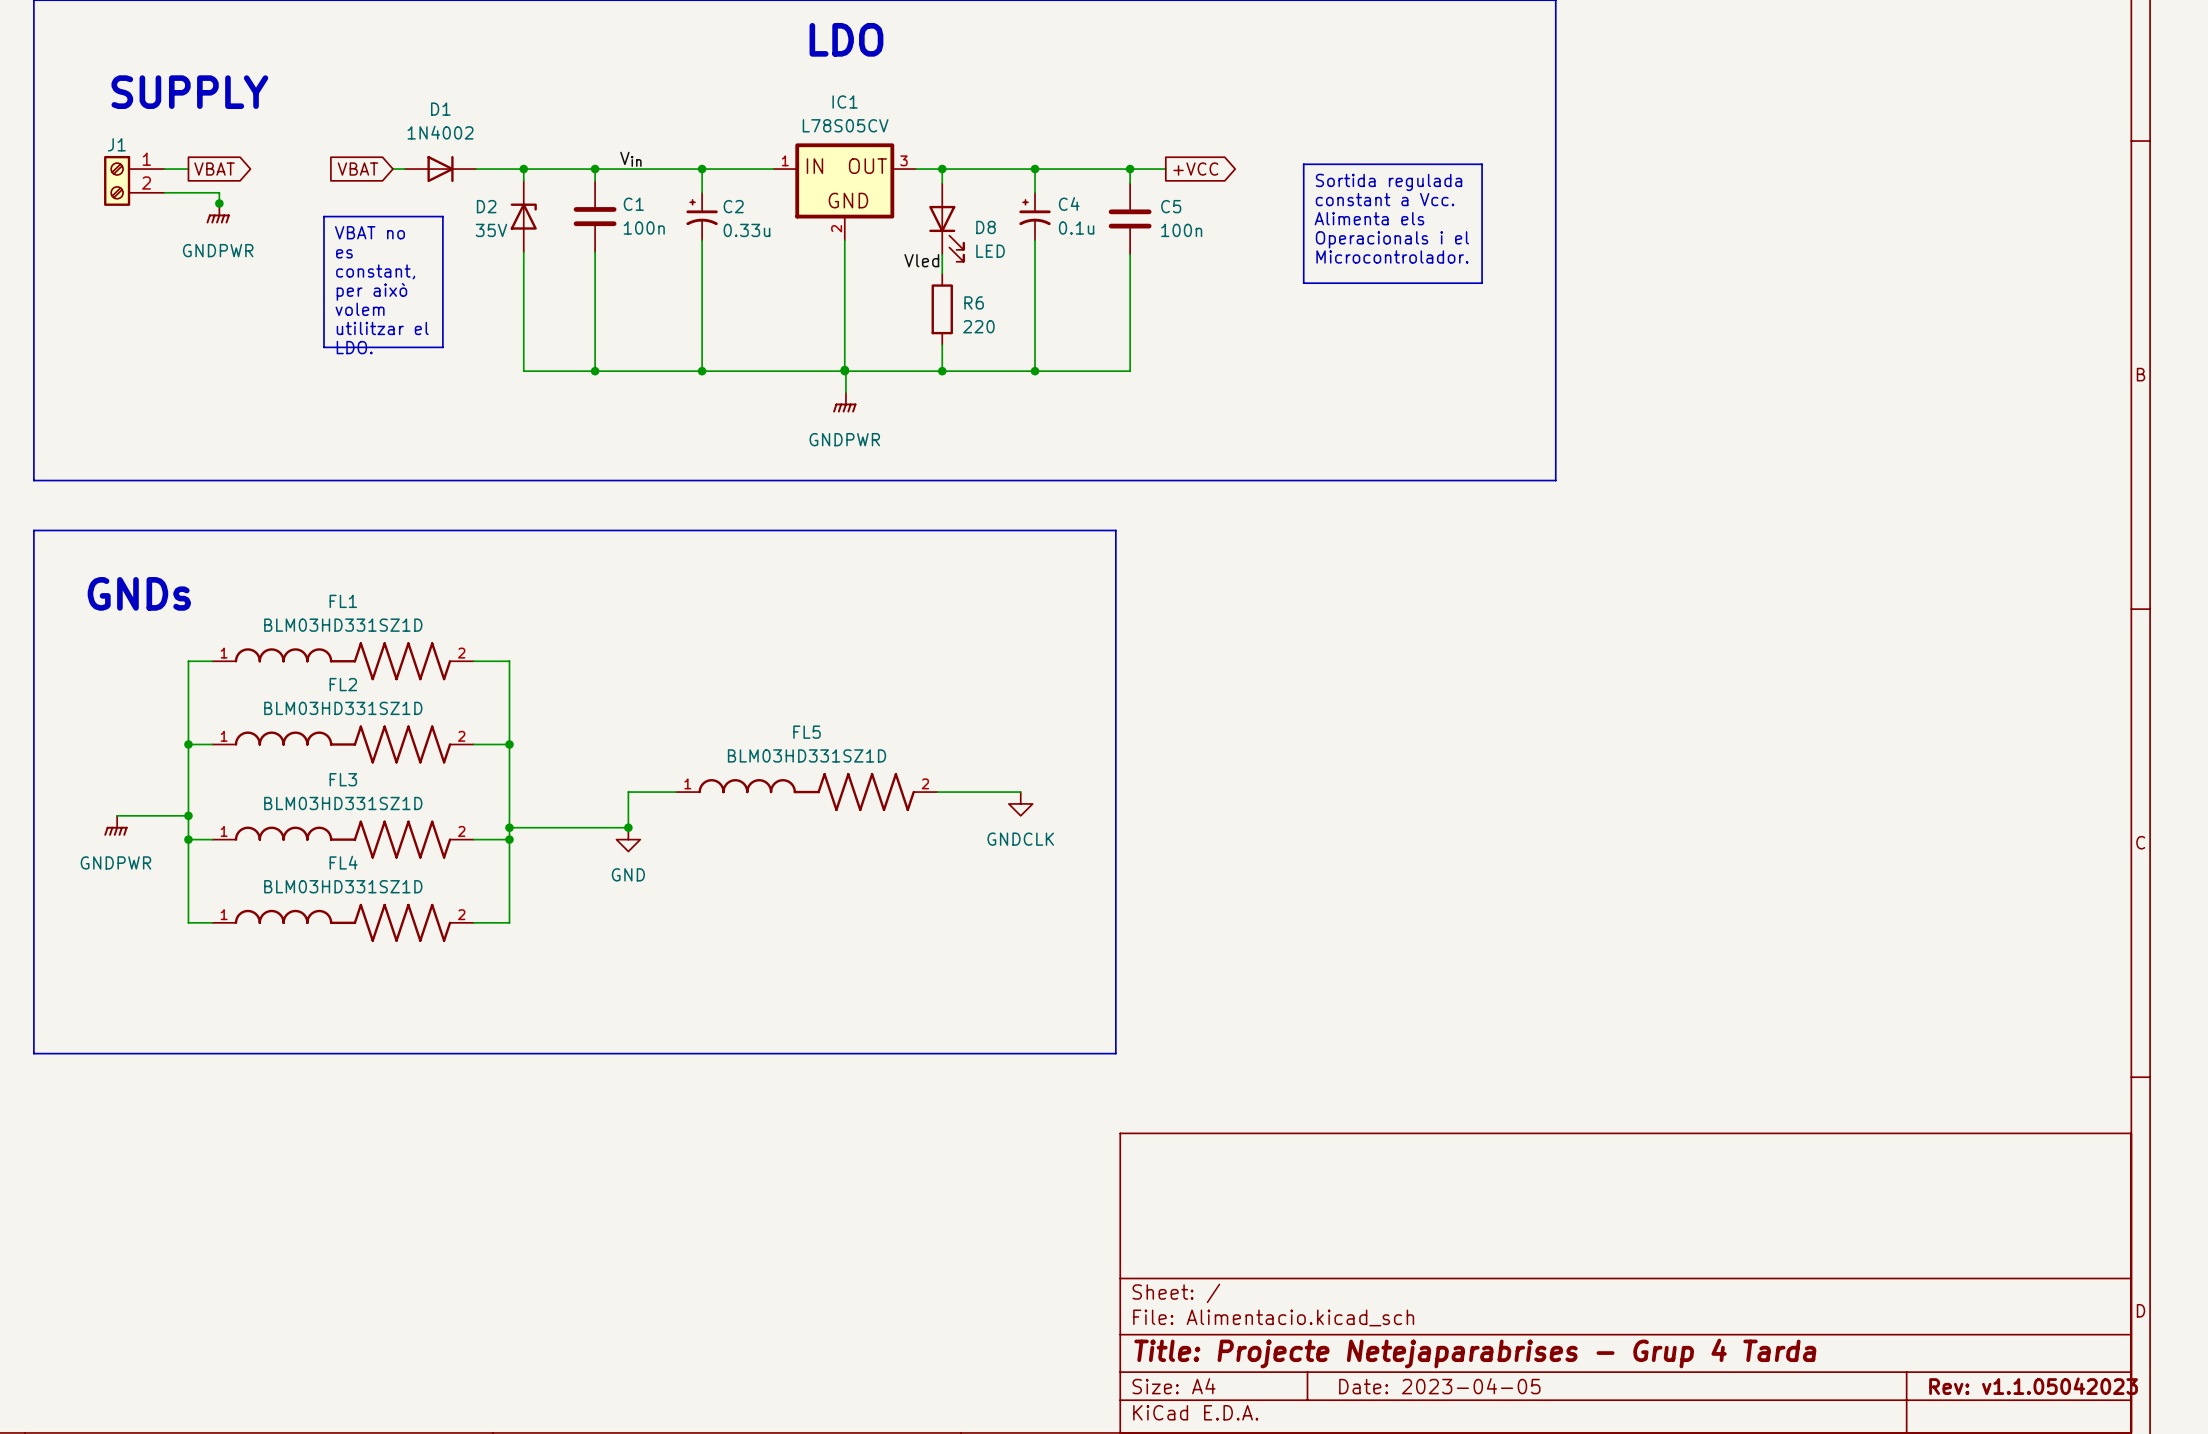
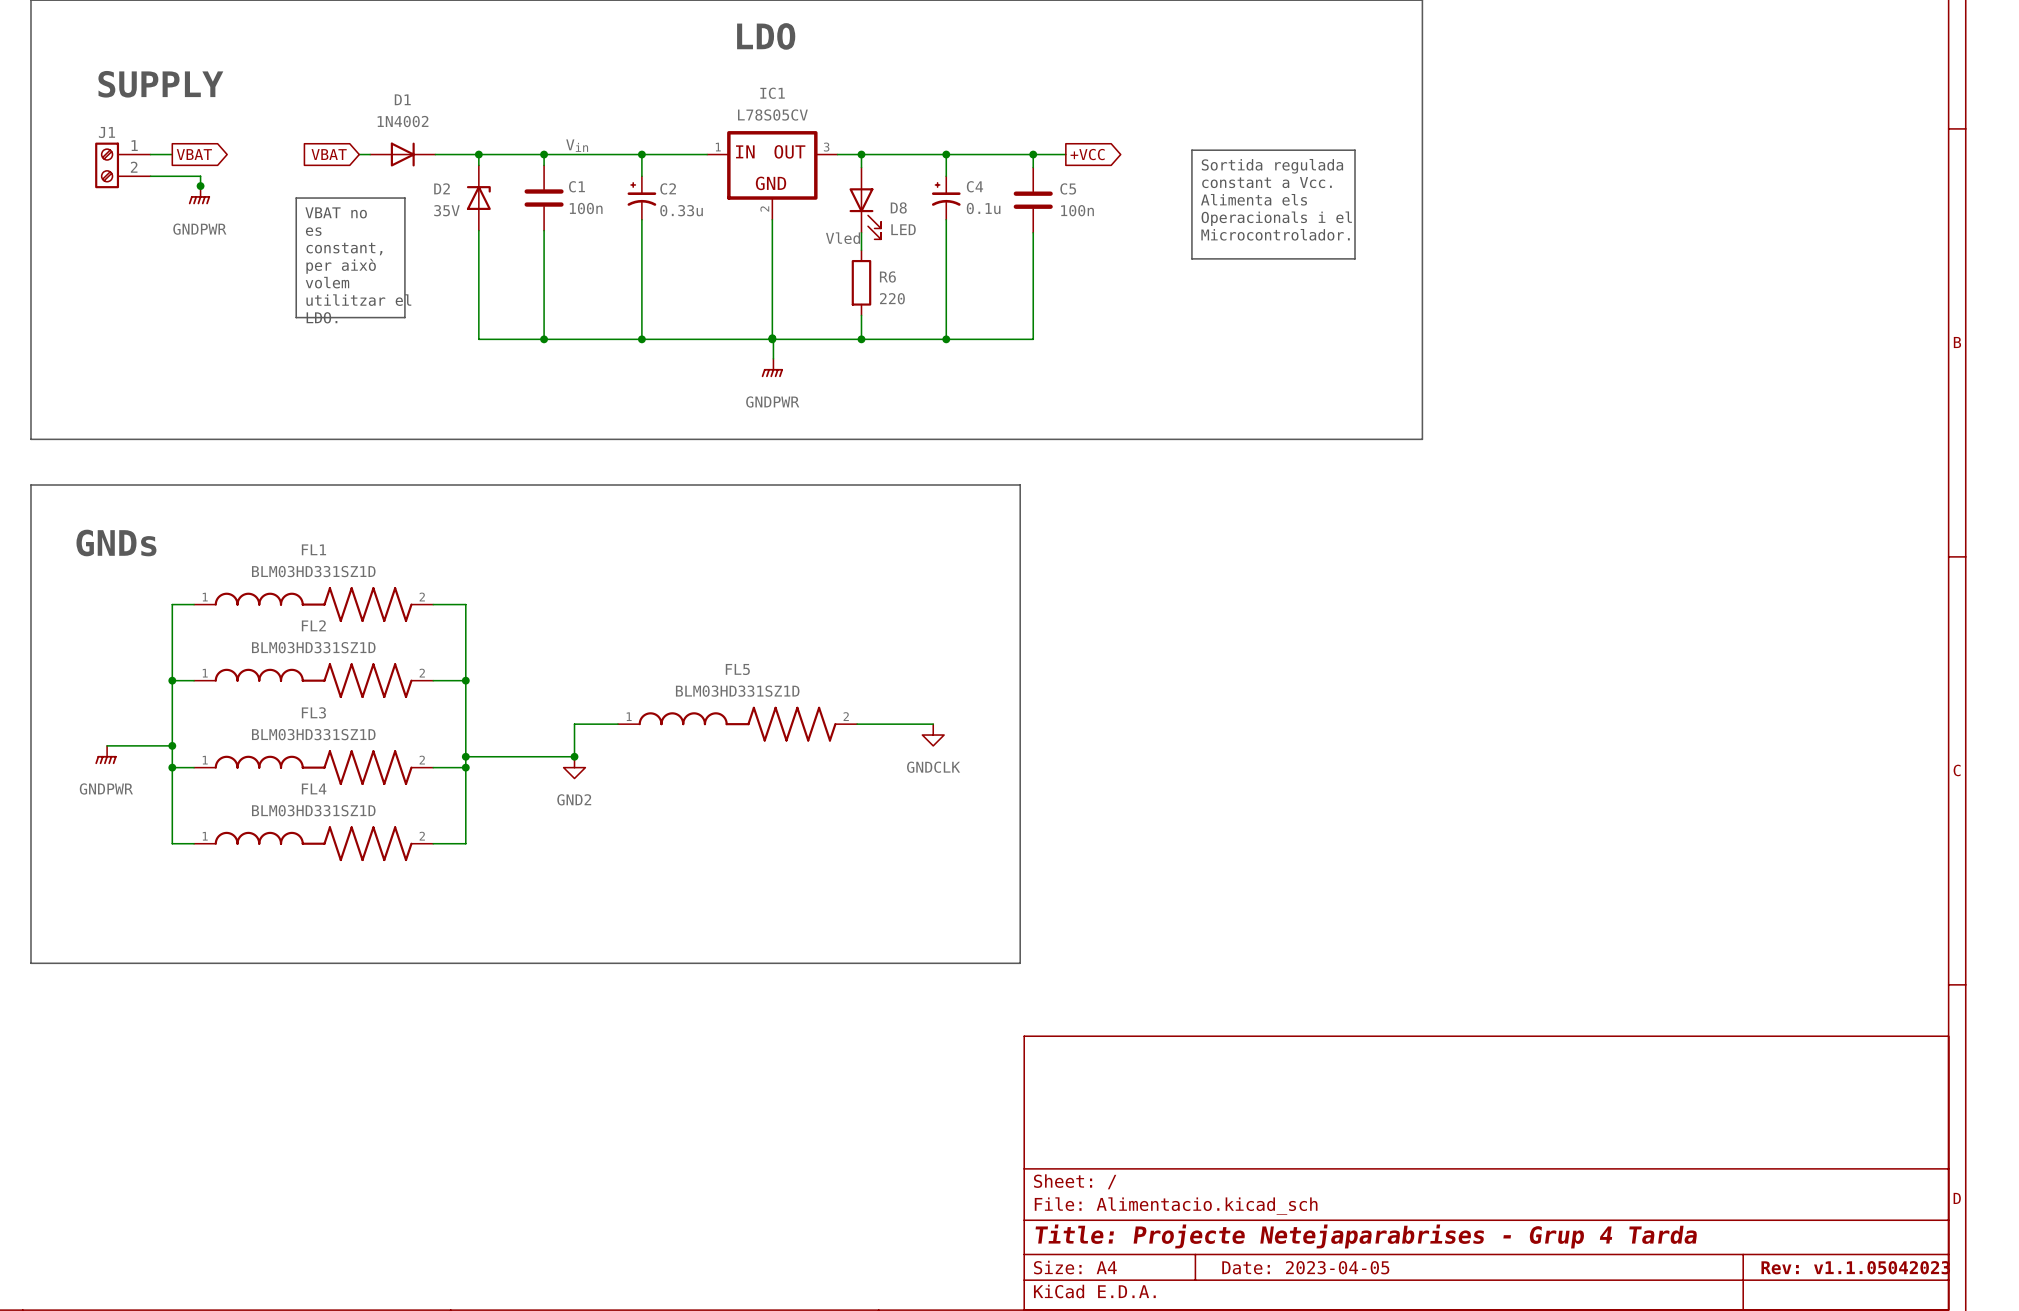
power symbol: GND (628, 839) -> GND2 (574, 767)

